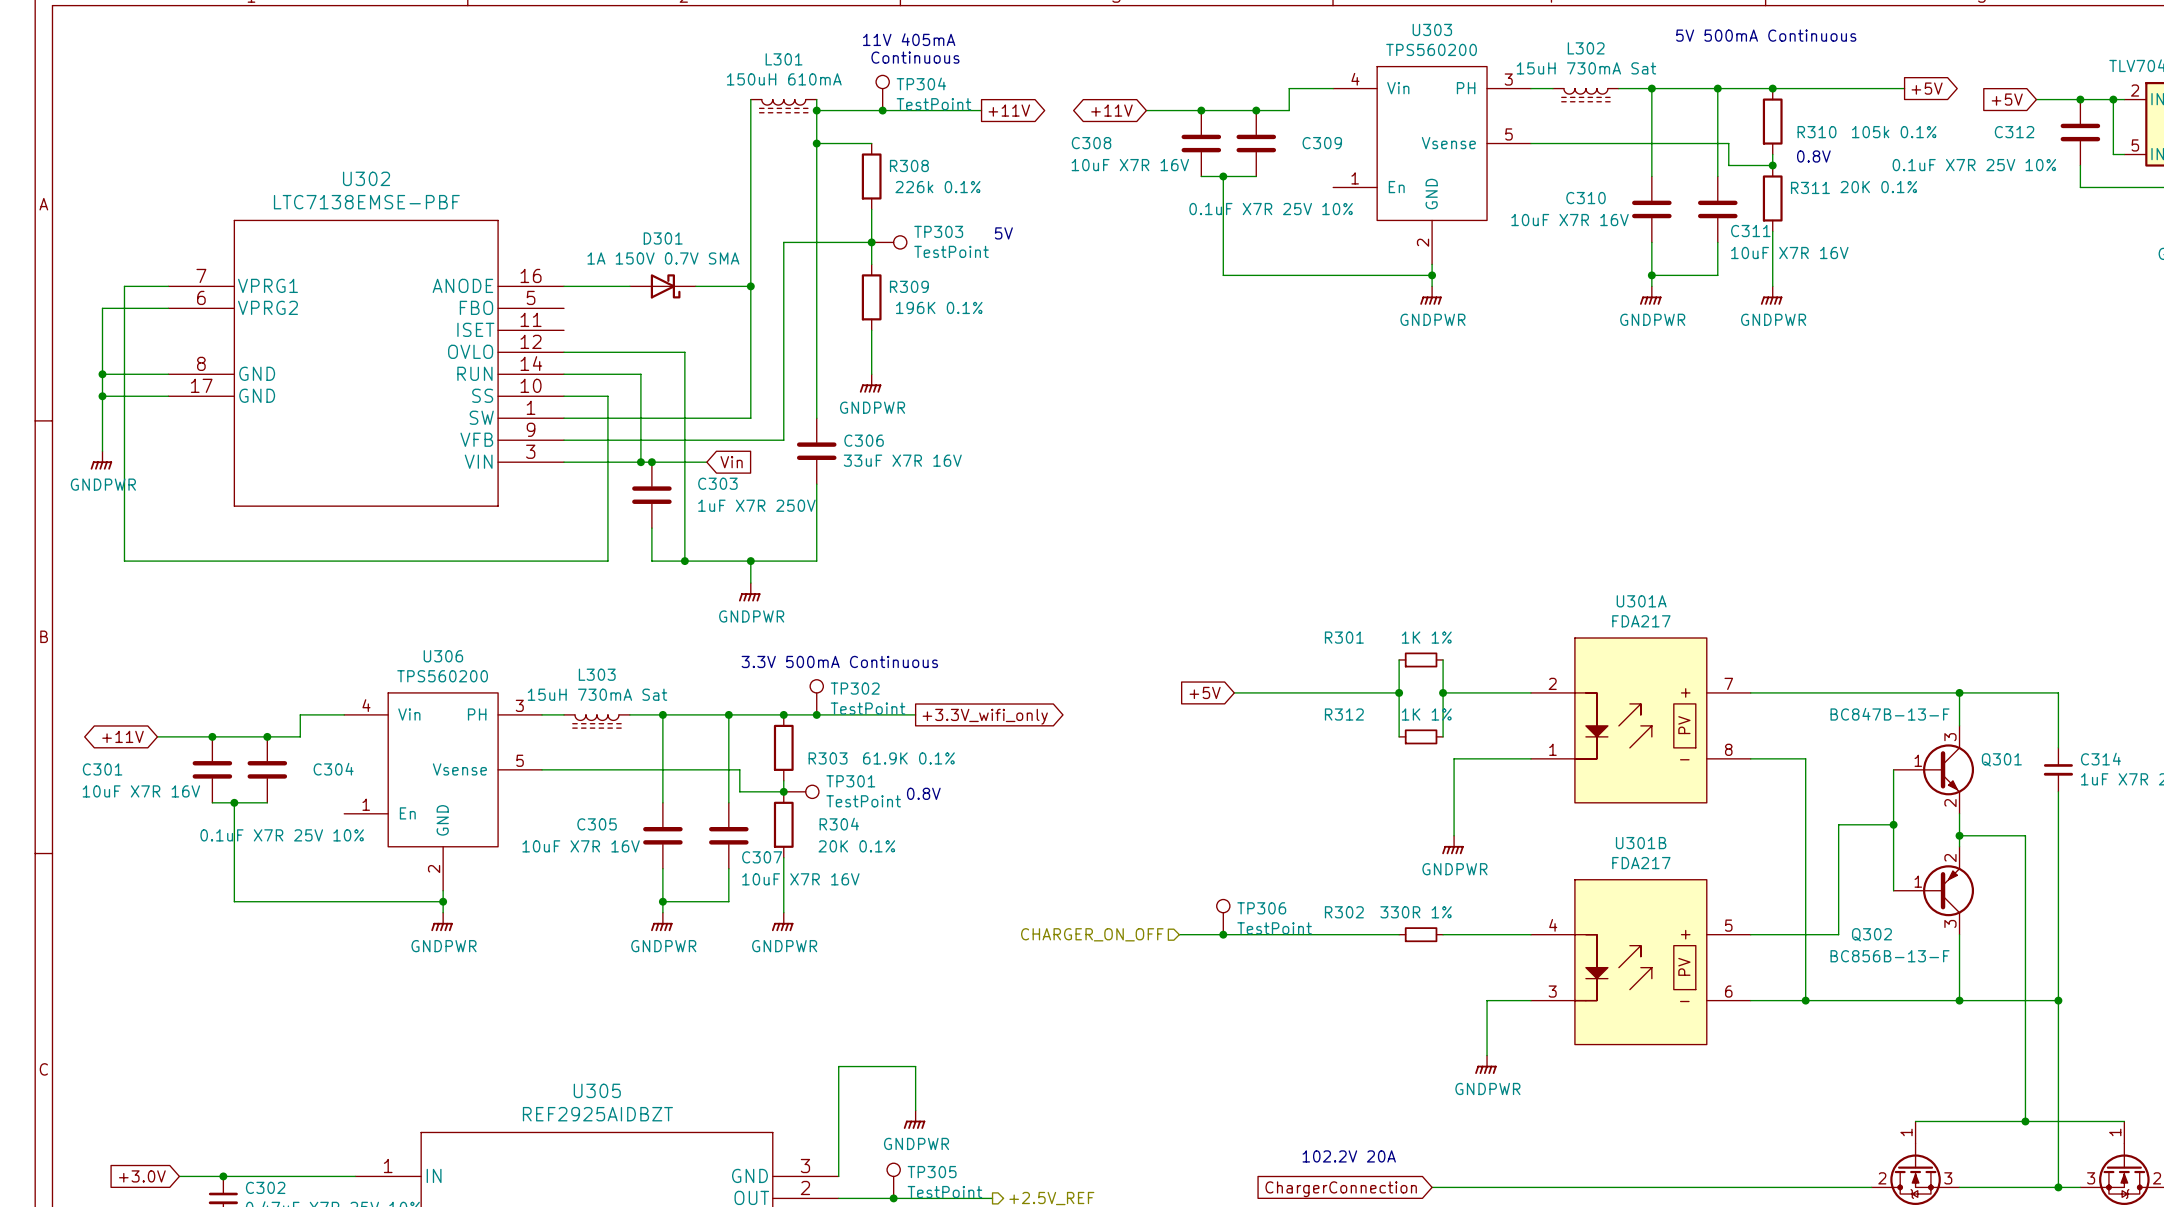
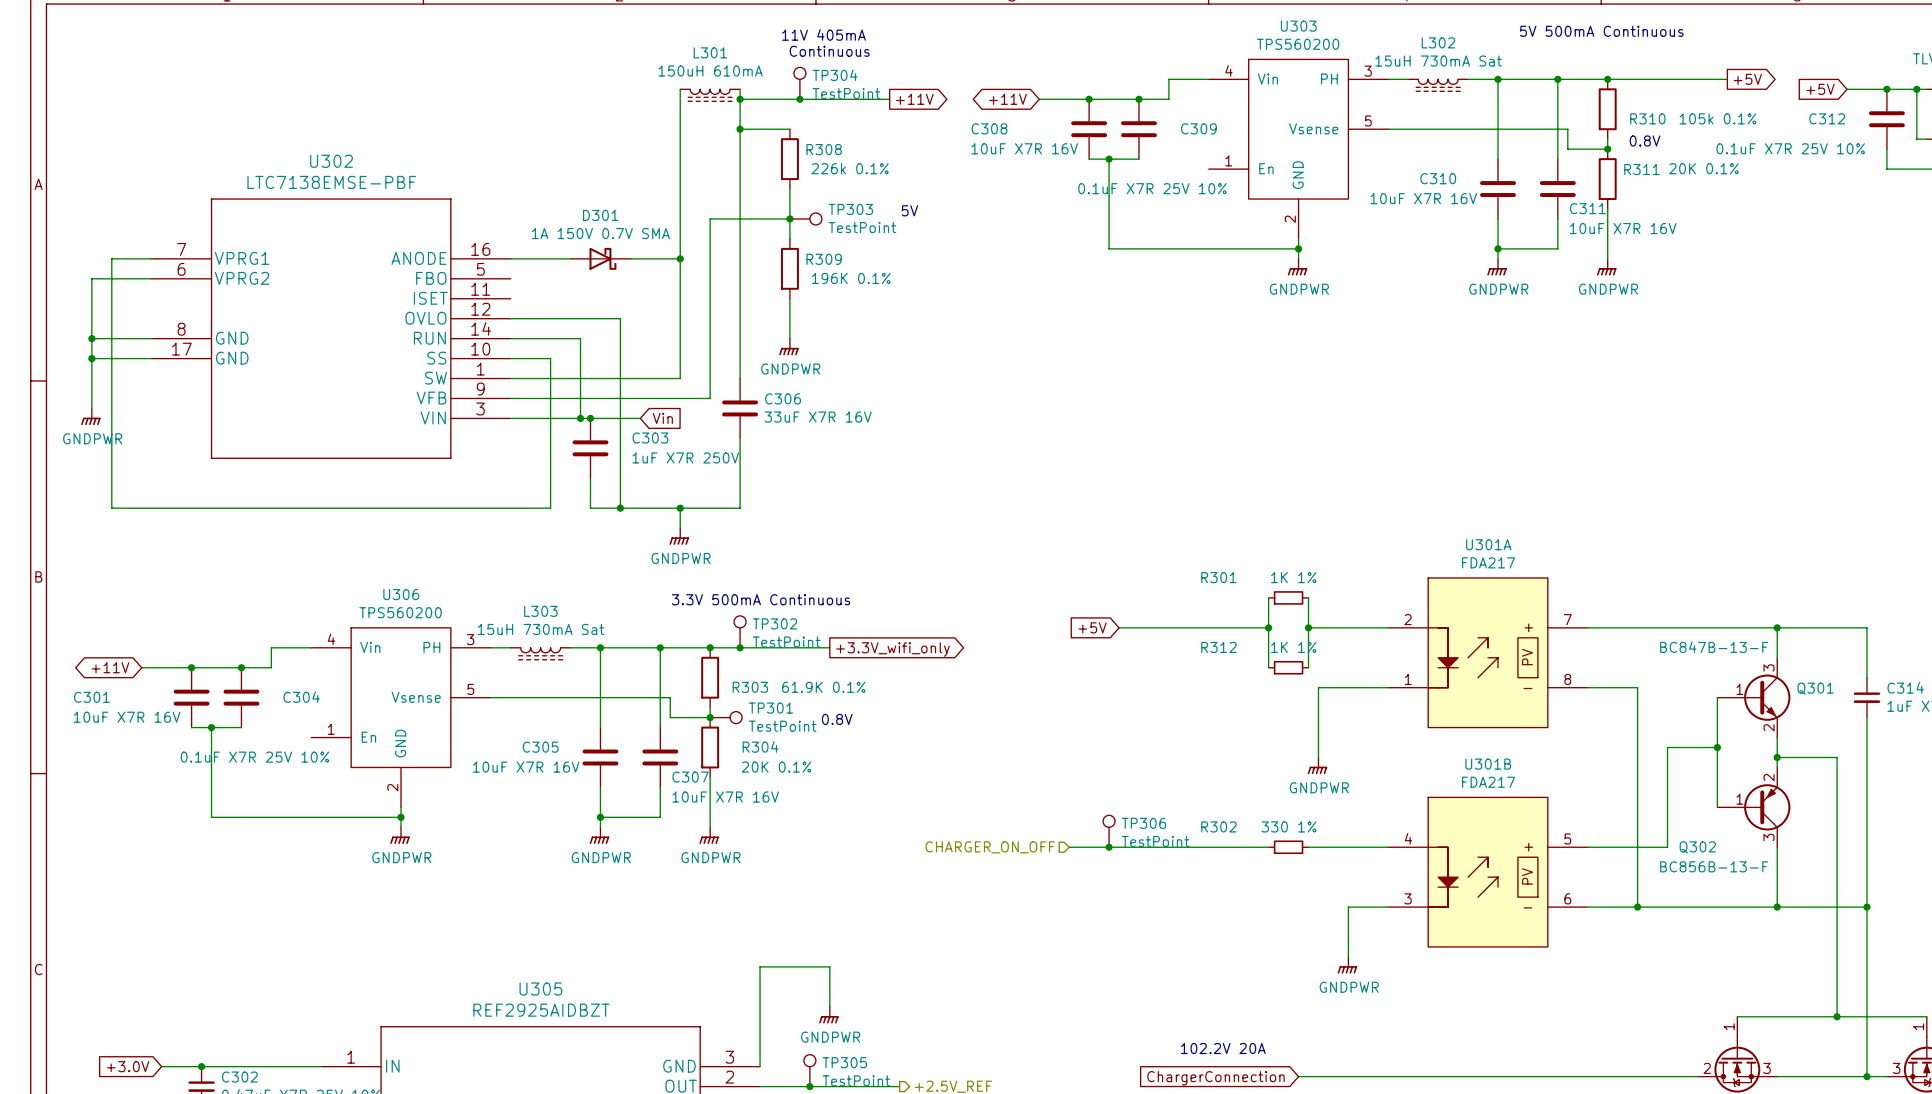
R302 value: 330R 1% (1416, 912) -> 330 1% (1288, 826)

